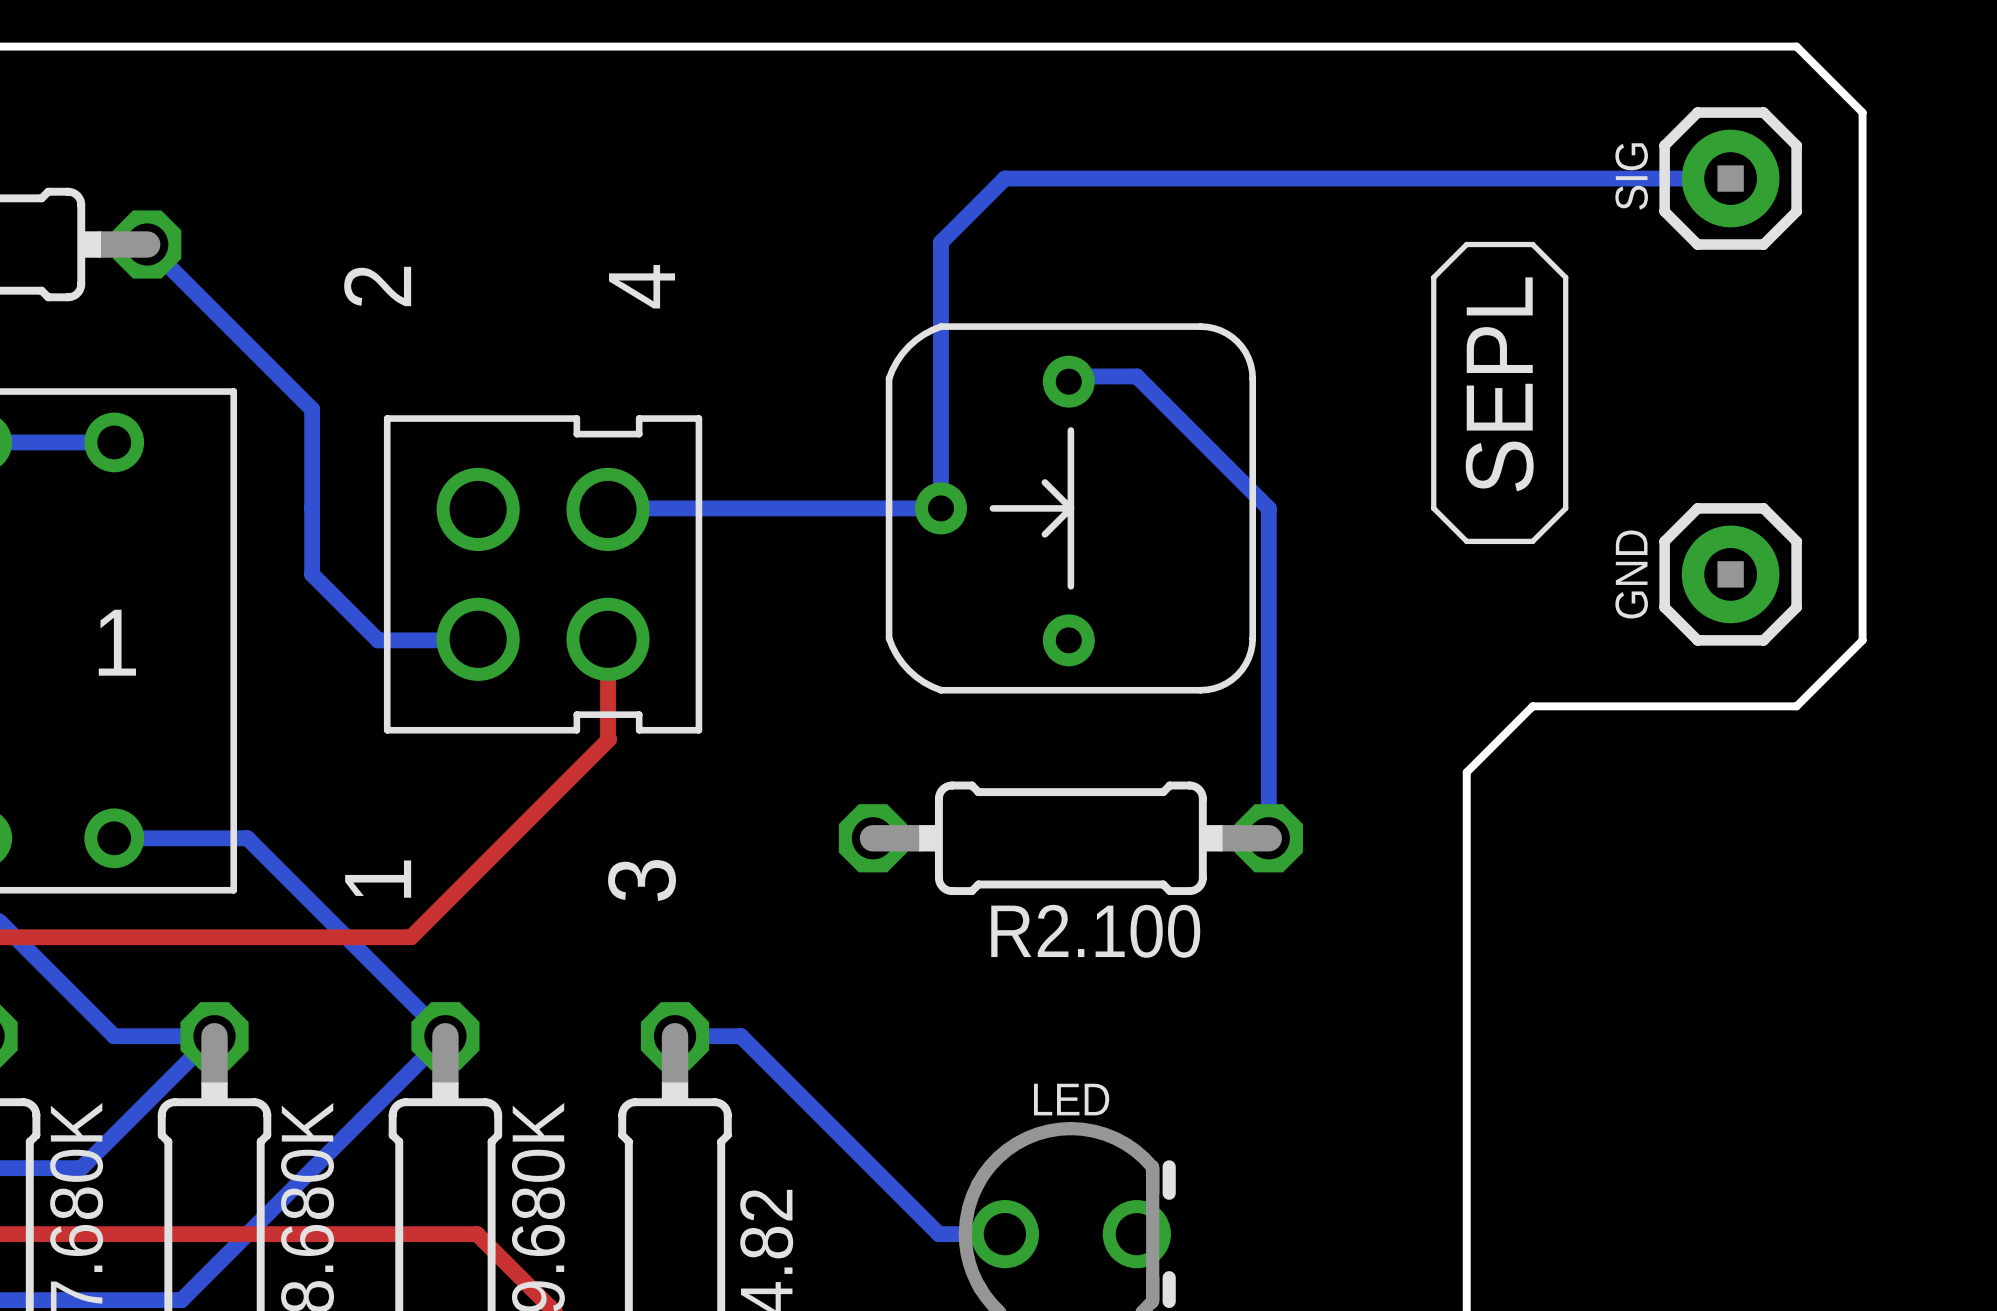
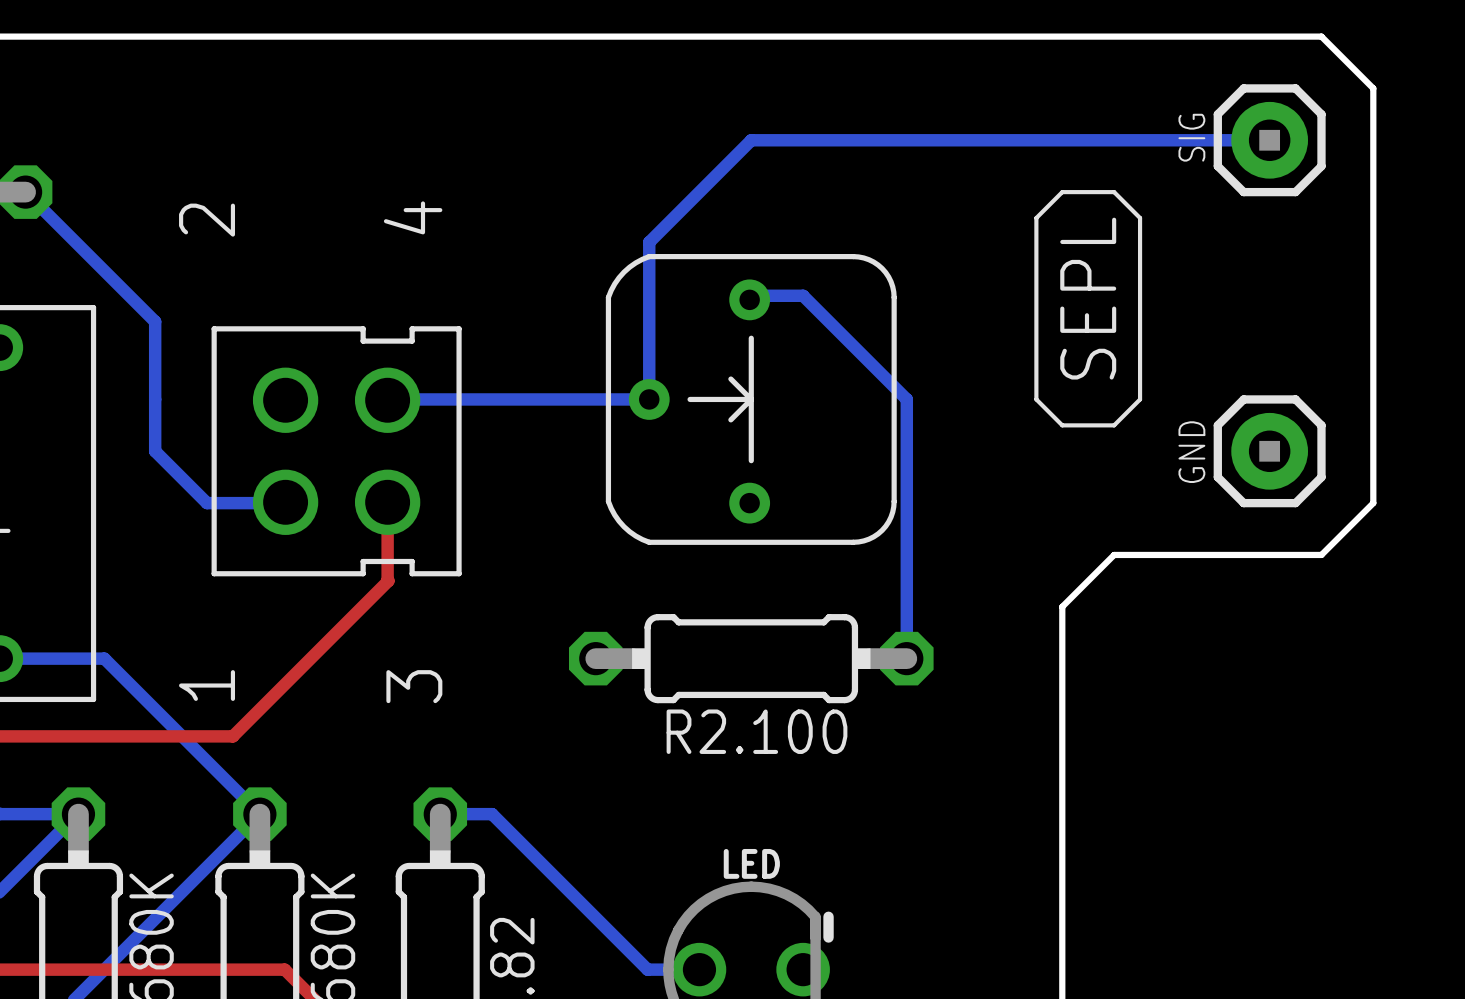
bottom track: (1070, 178) (1004, 178) (941, 242) (941, 308) -> (751, 140) (649, 242)

